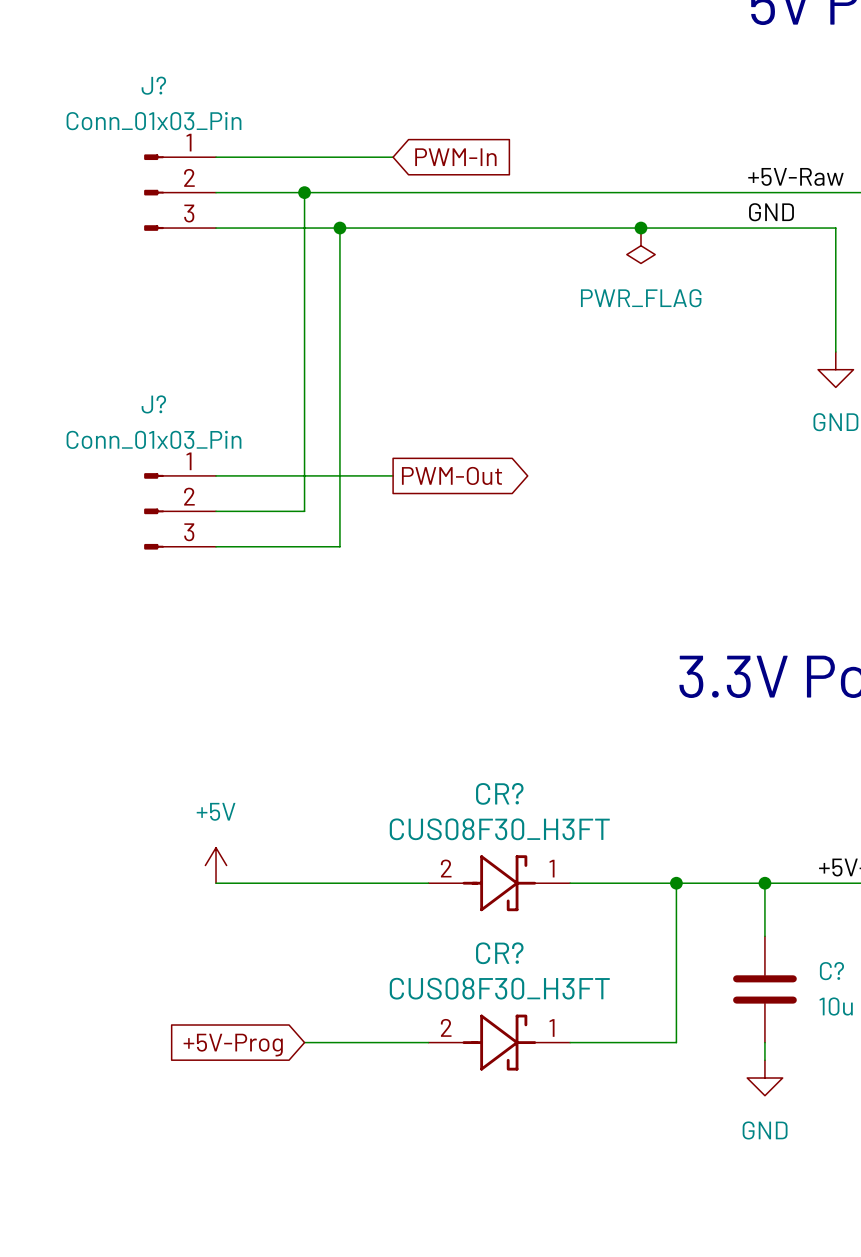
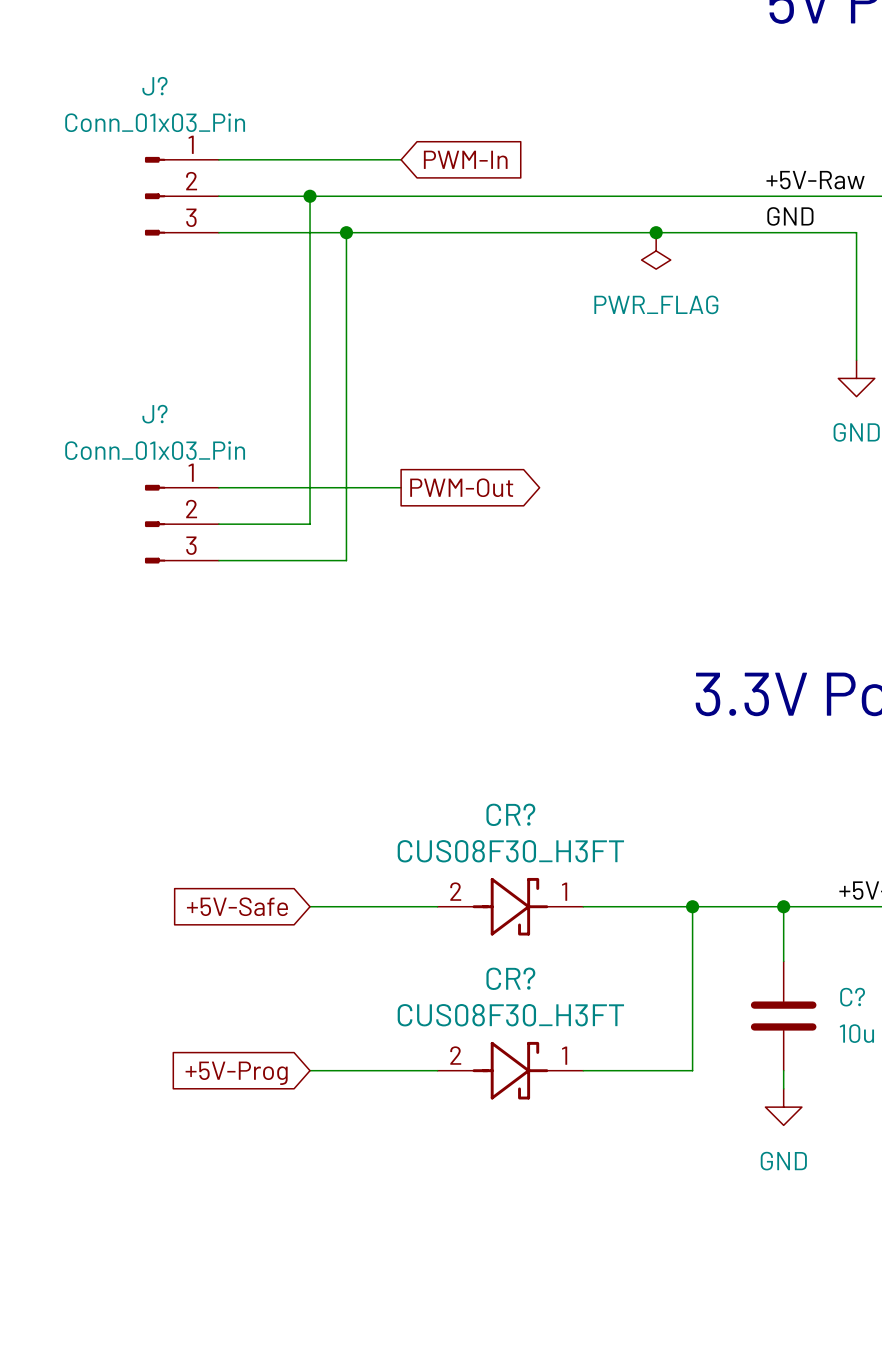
power symbol: +5V (216, 865) -> none
wire: (216, 883) (304, 883) -> none
global label: none -> +5V-Safe (237, 906)

